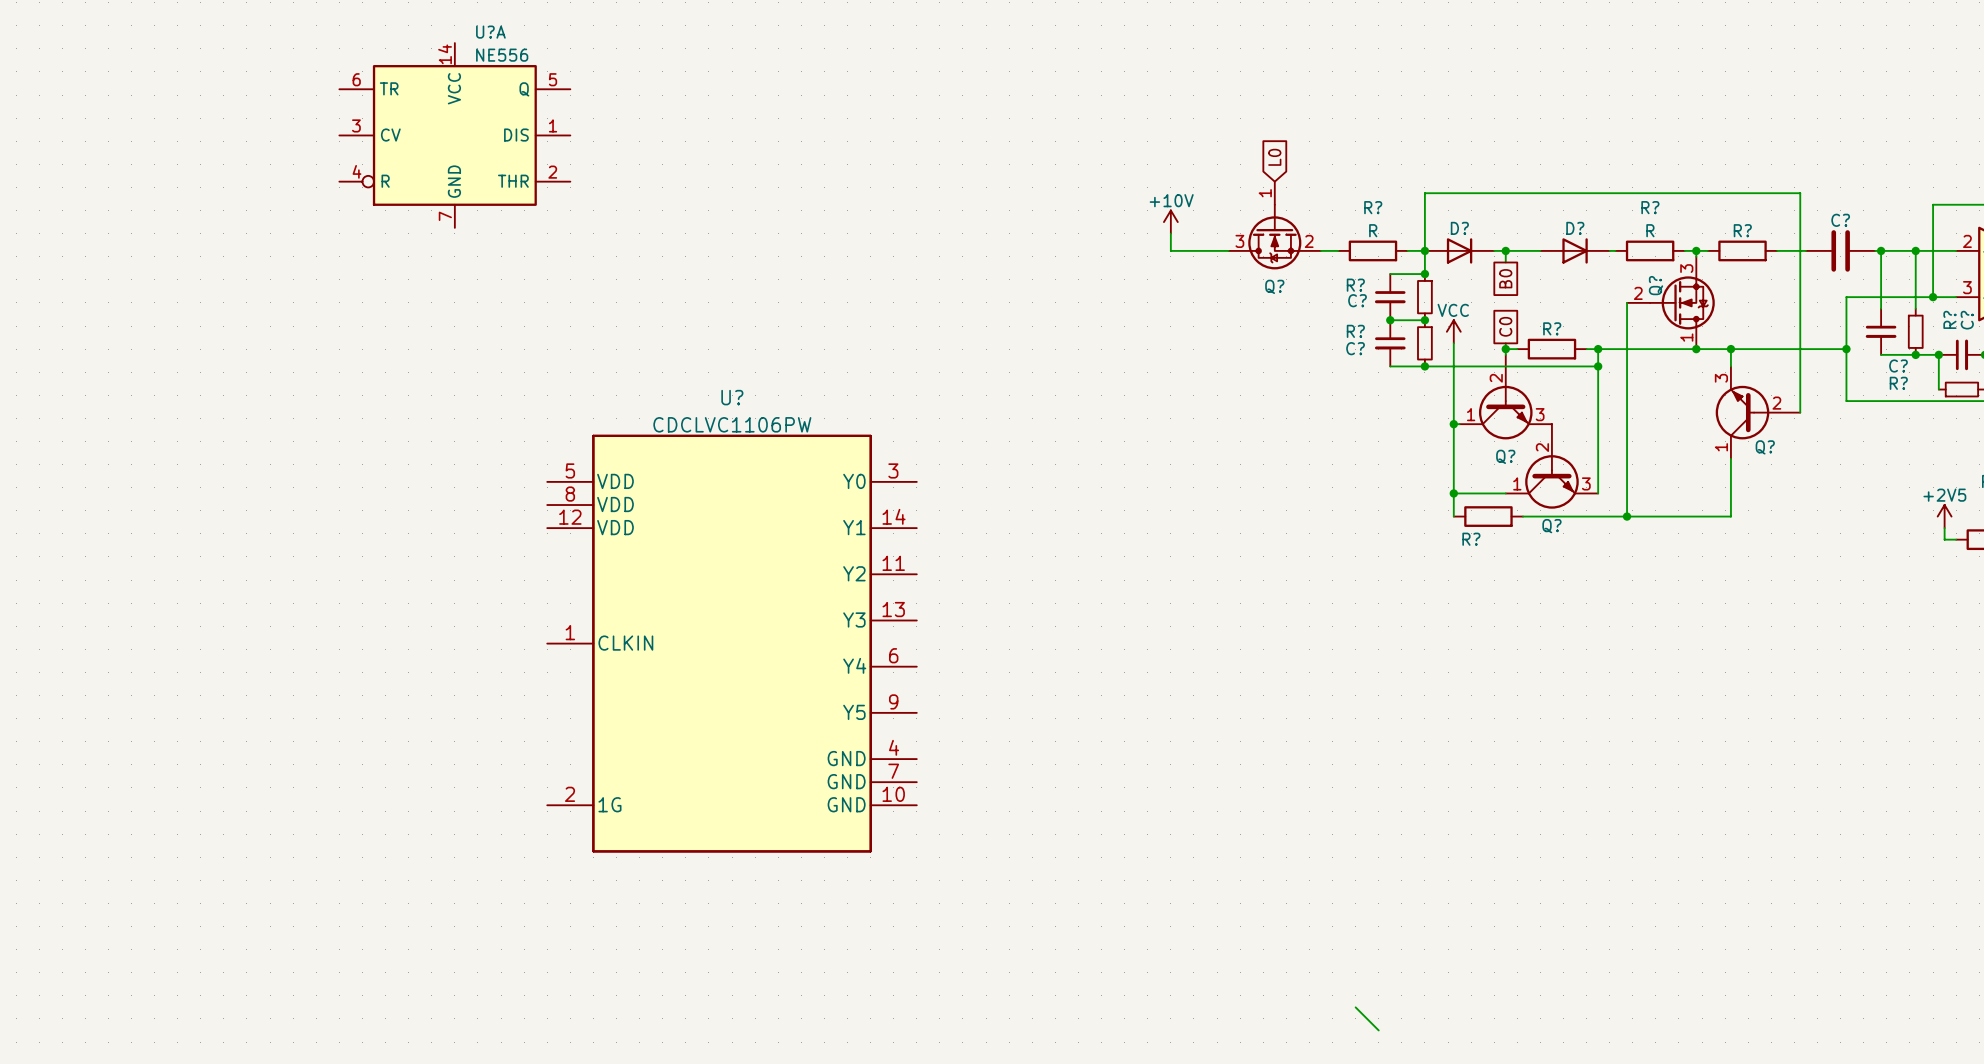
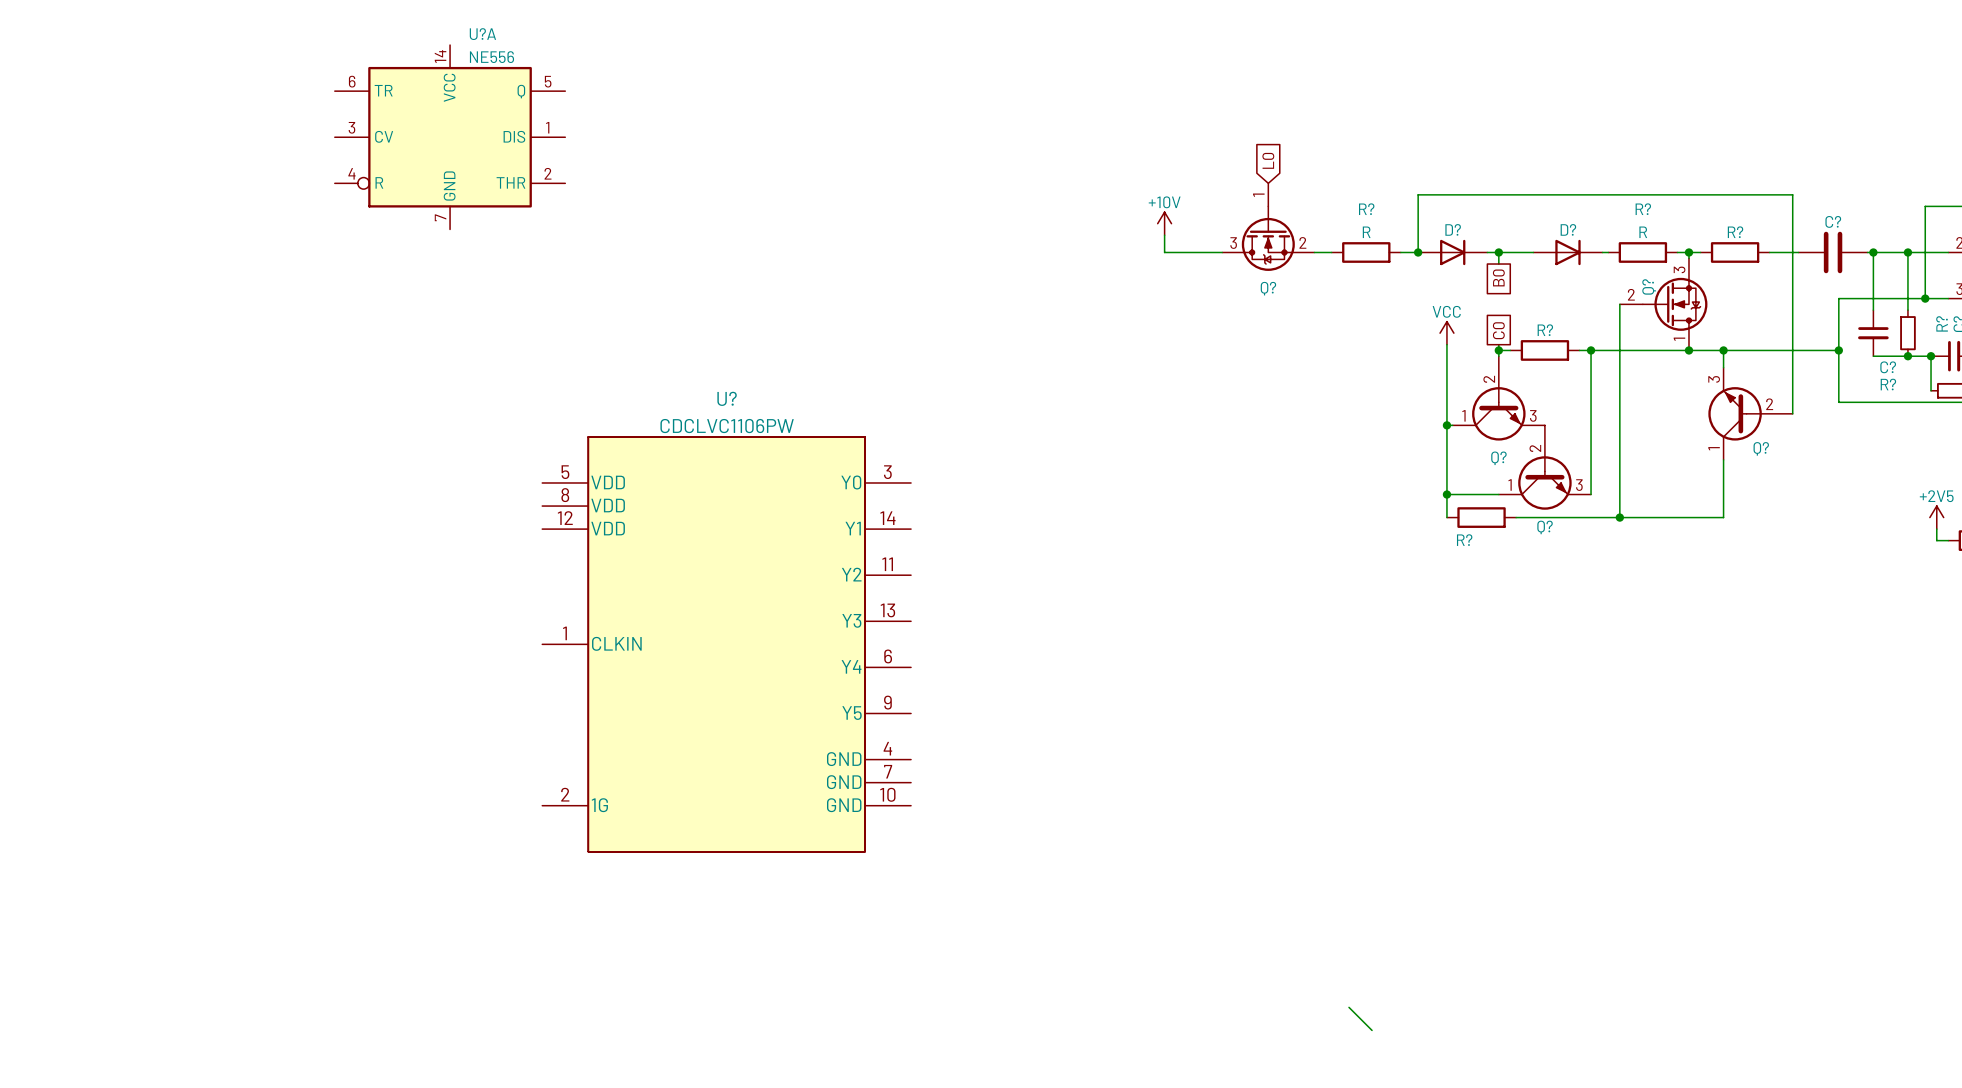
wire: (1424, 250) (1424, 274) (1390, 274) -> none
junction: (1424, 274) -> none
C?: (1390, 297) -> none
R?: (1424, 297) -> none
wire: (1390, 320) (1424, 320) -> none
junction: (1390, 320) -> none
junction: (1424, 320) -> none
C?: (1390, 343) -> none
R?: (1424, 343) -> none
wire: (1390, 366) (1598, 366) -> none
junction: (1424, 366) -> none
junction: (1598, 366) -> none

